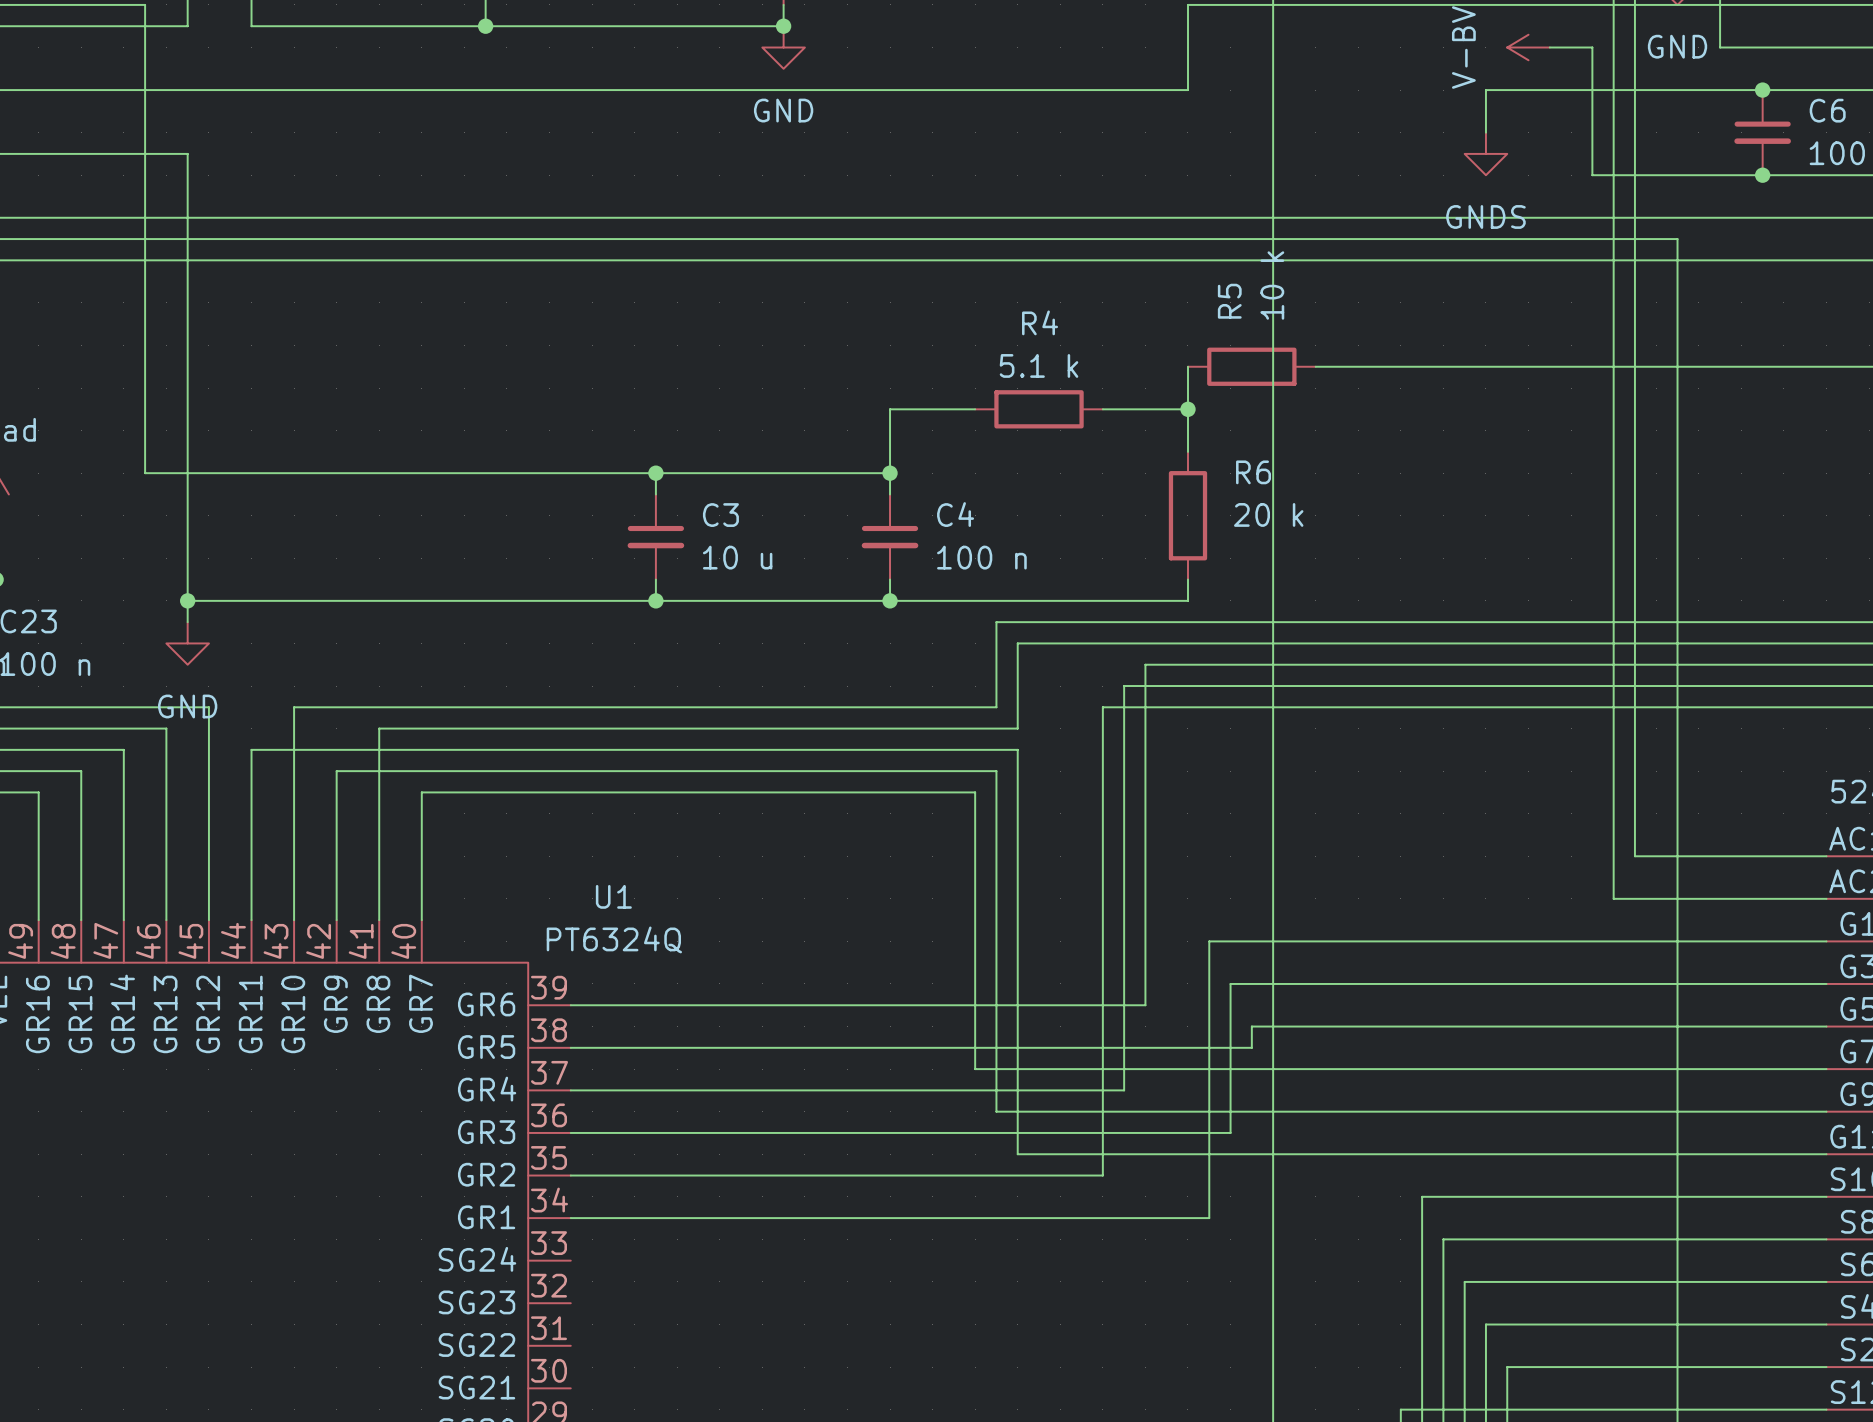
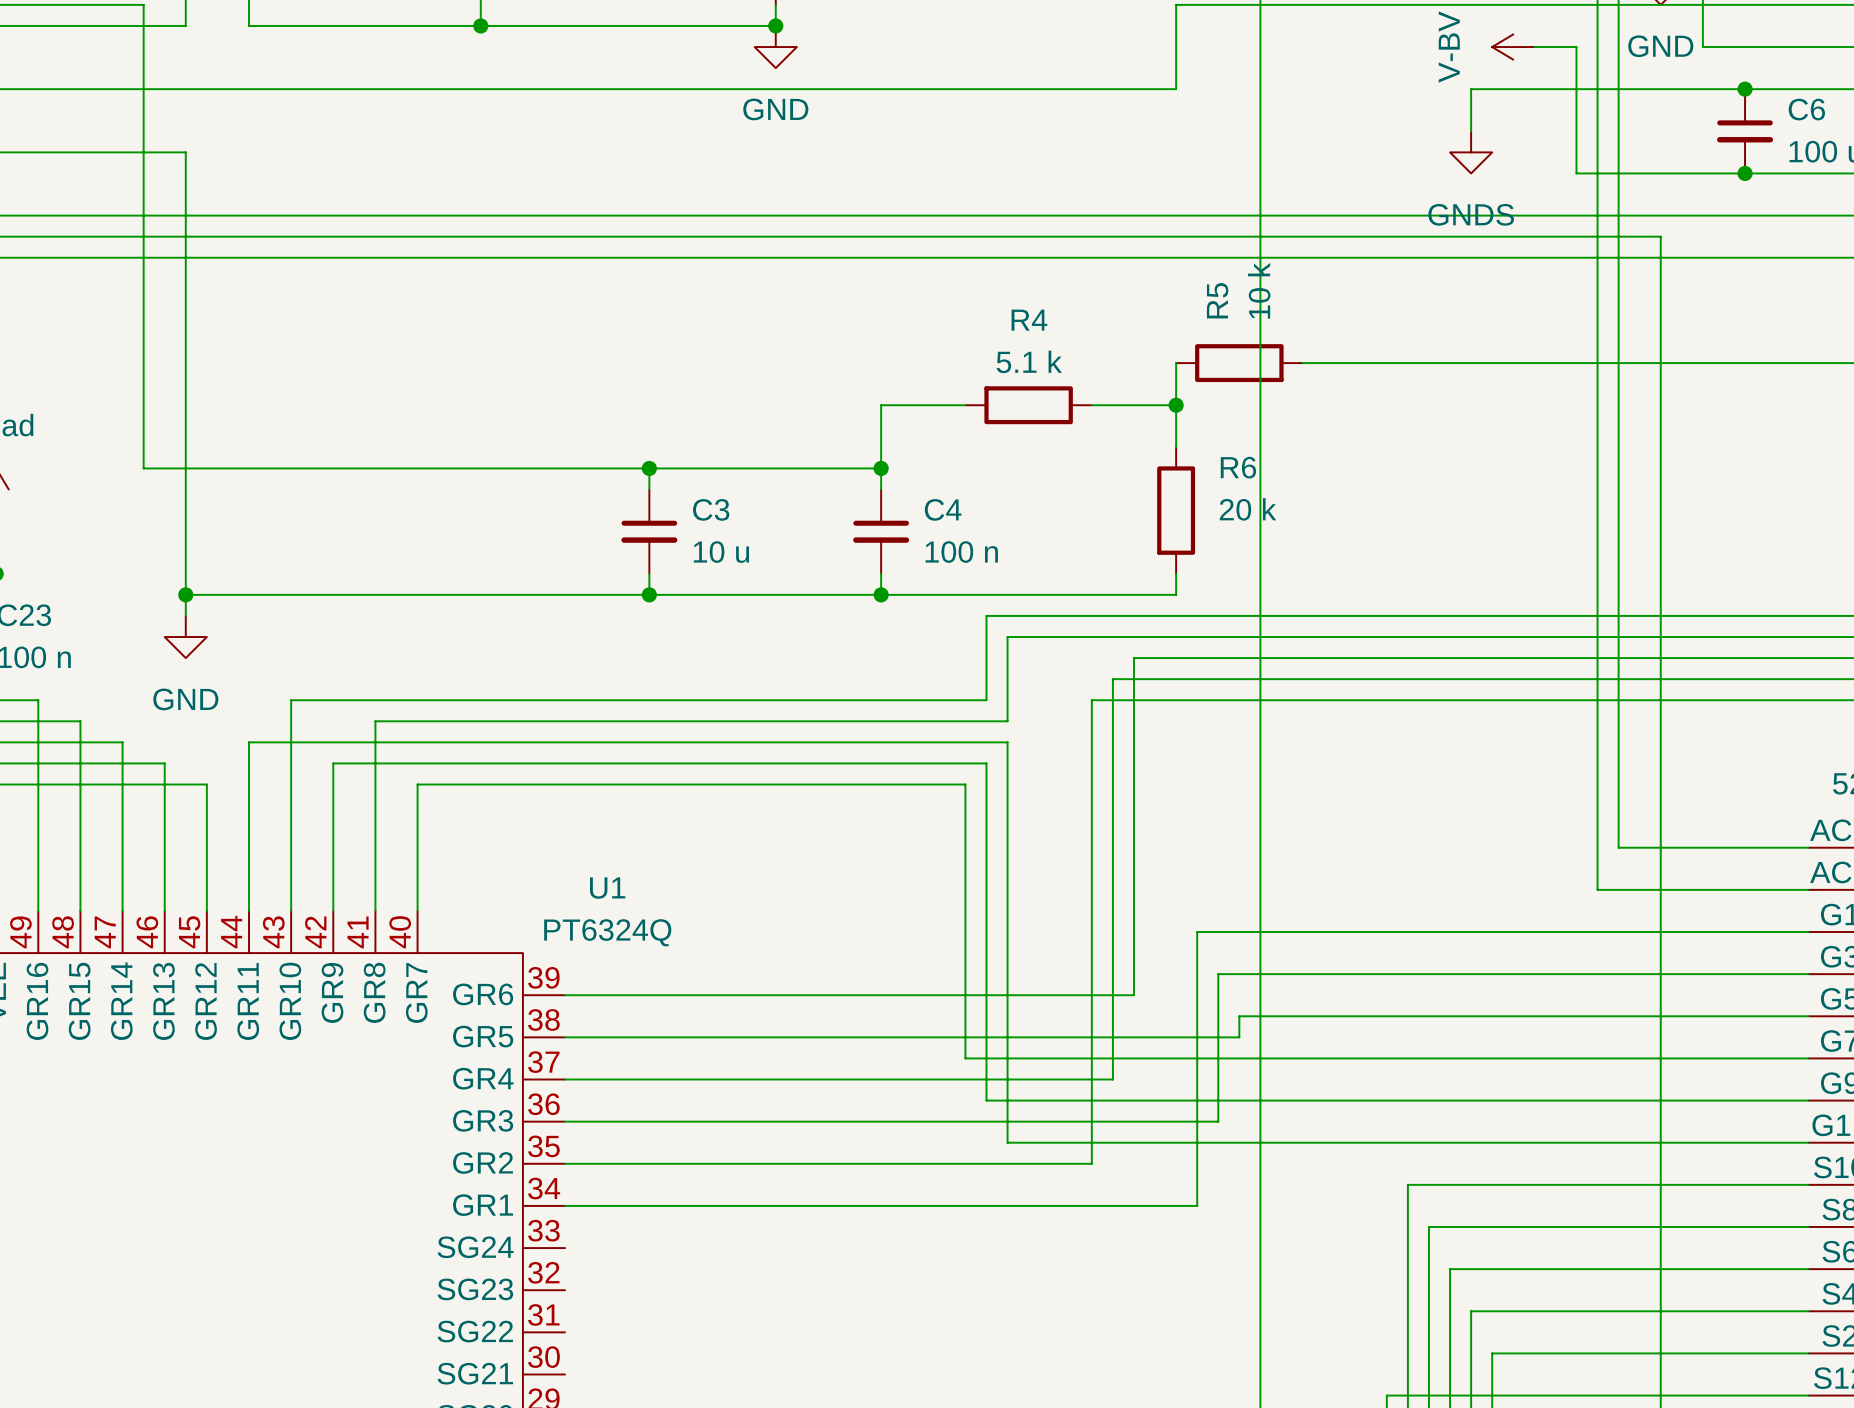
wire: (38, 707) (208, 707) (208, 792) -> (38, 700) (38, 784) (206, 784)
wire: (81, 728) (166, 728) (166, 771) -> (80, 721) (80, 763) (164, 763)

